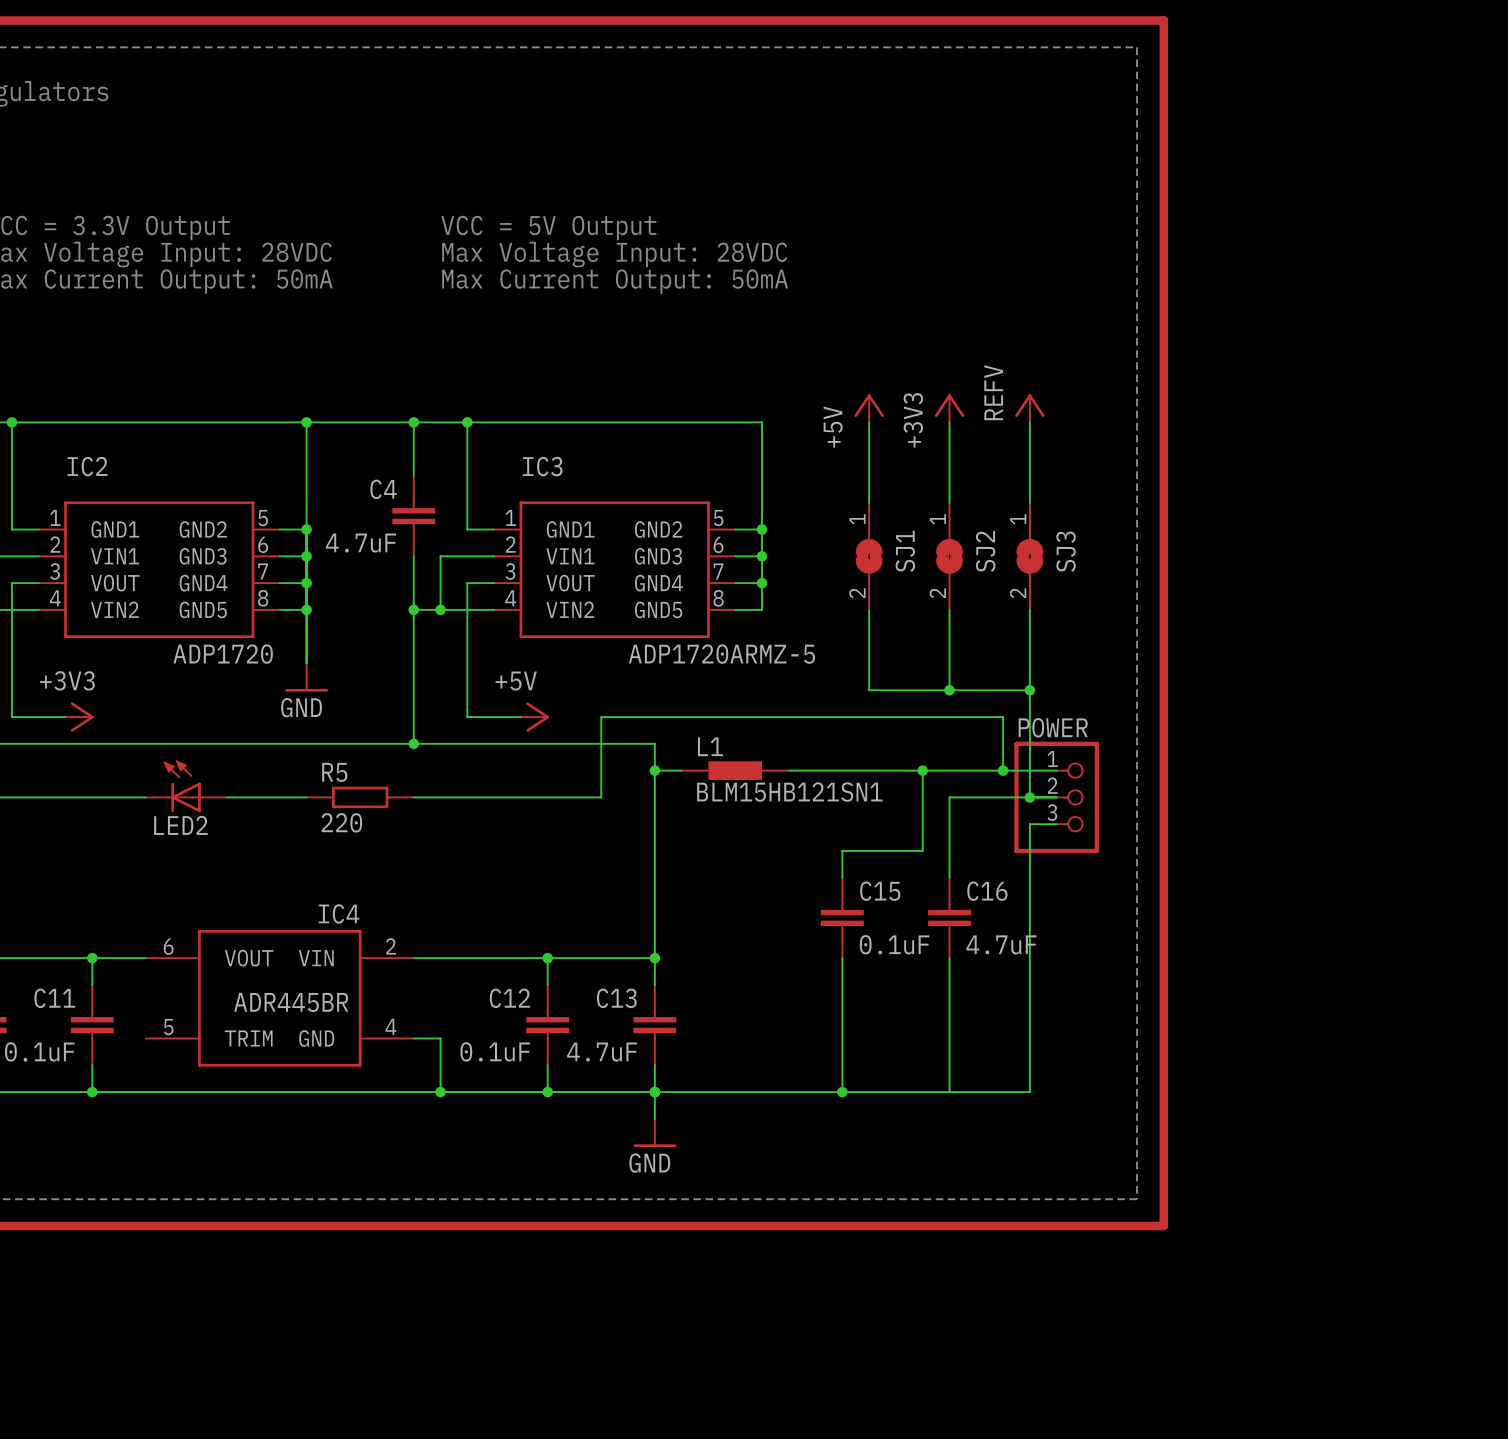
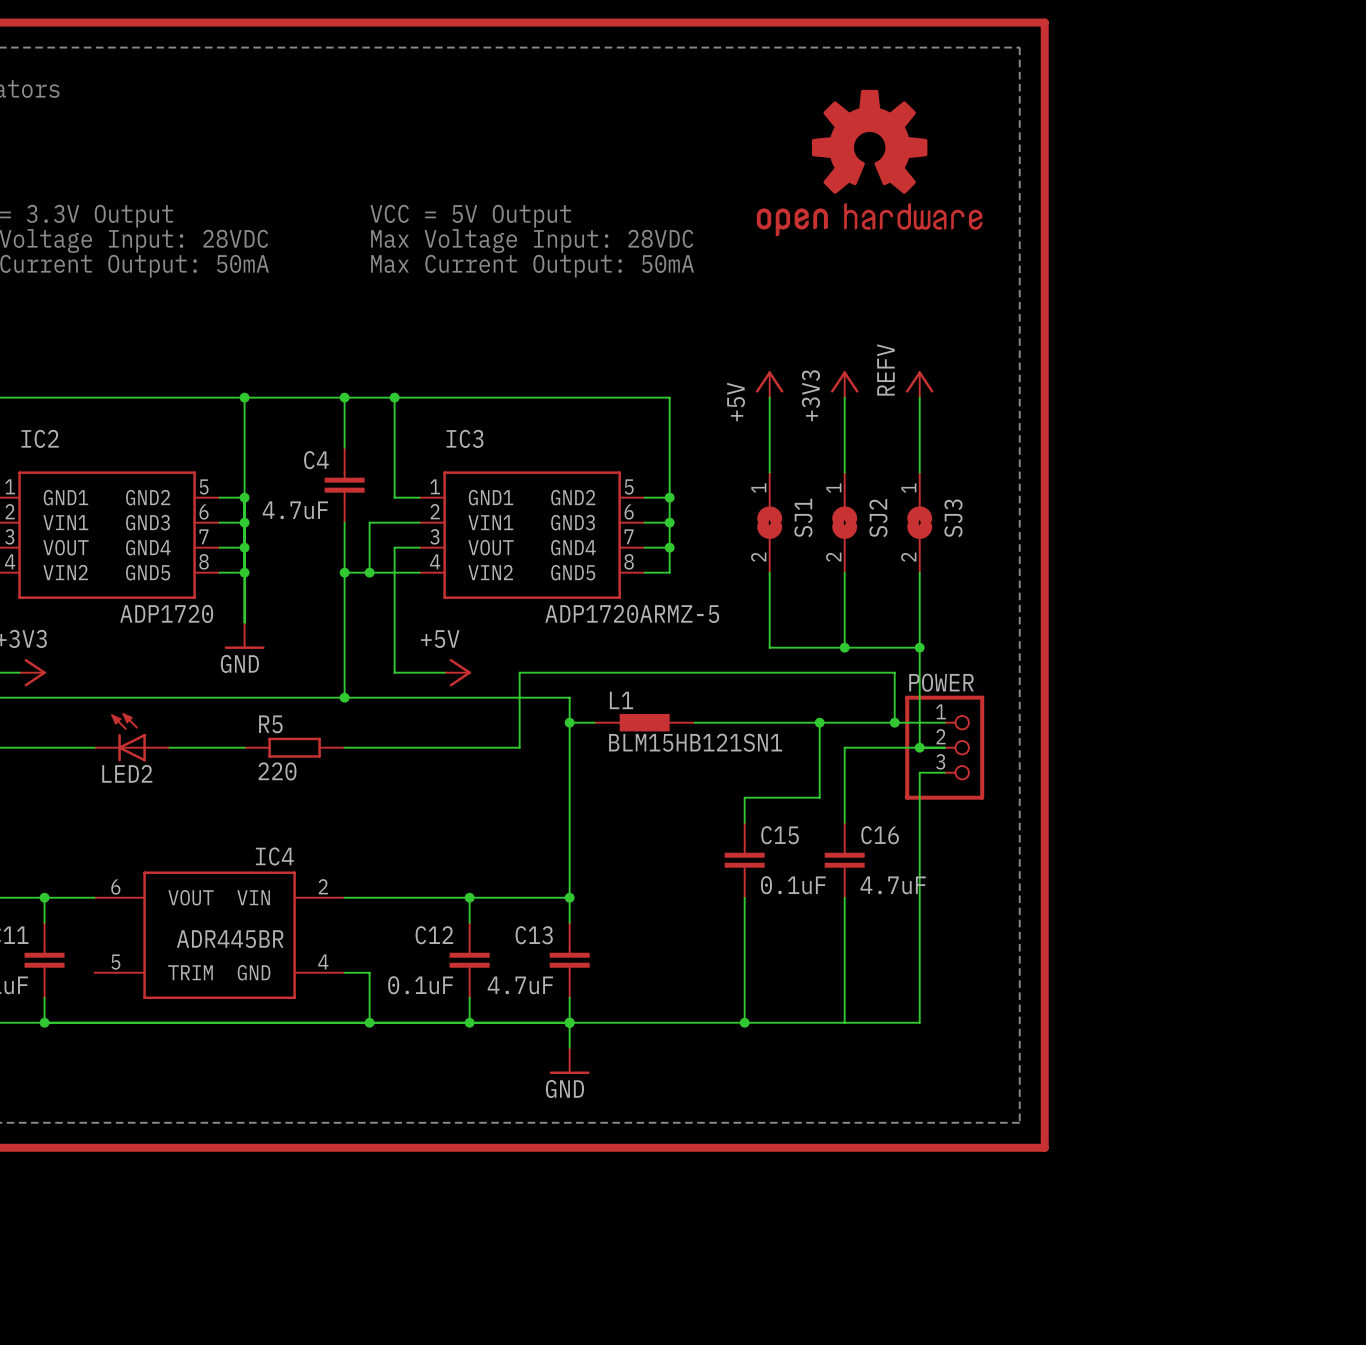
part: none -> (869, 163)

